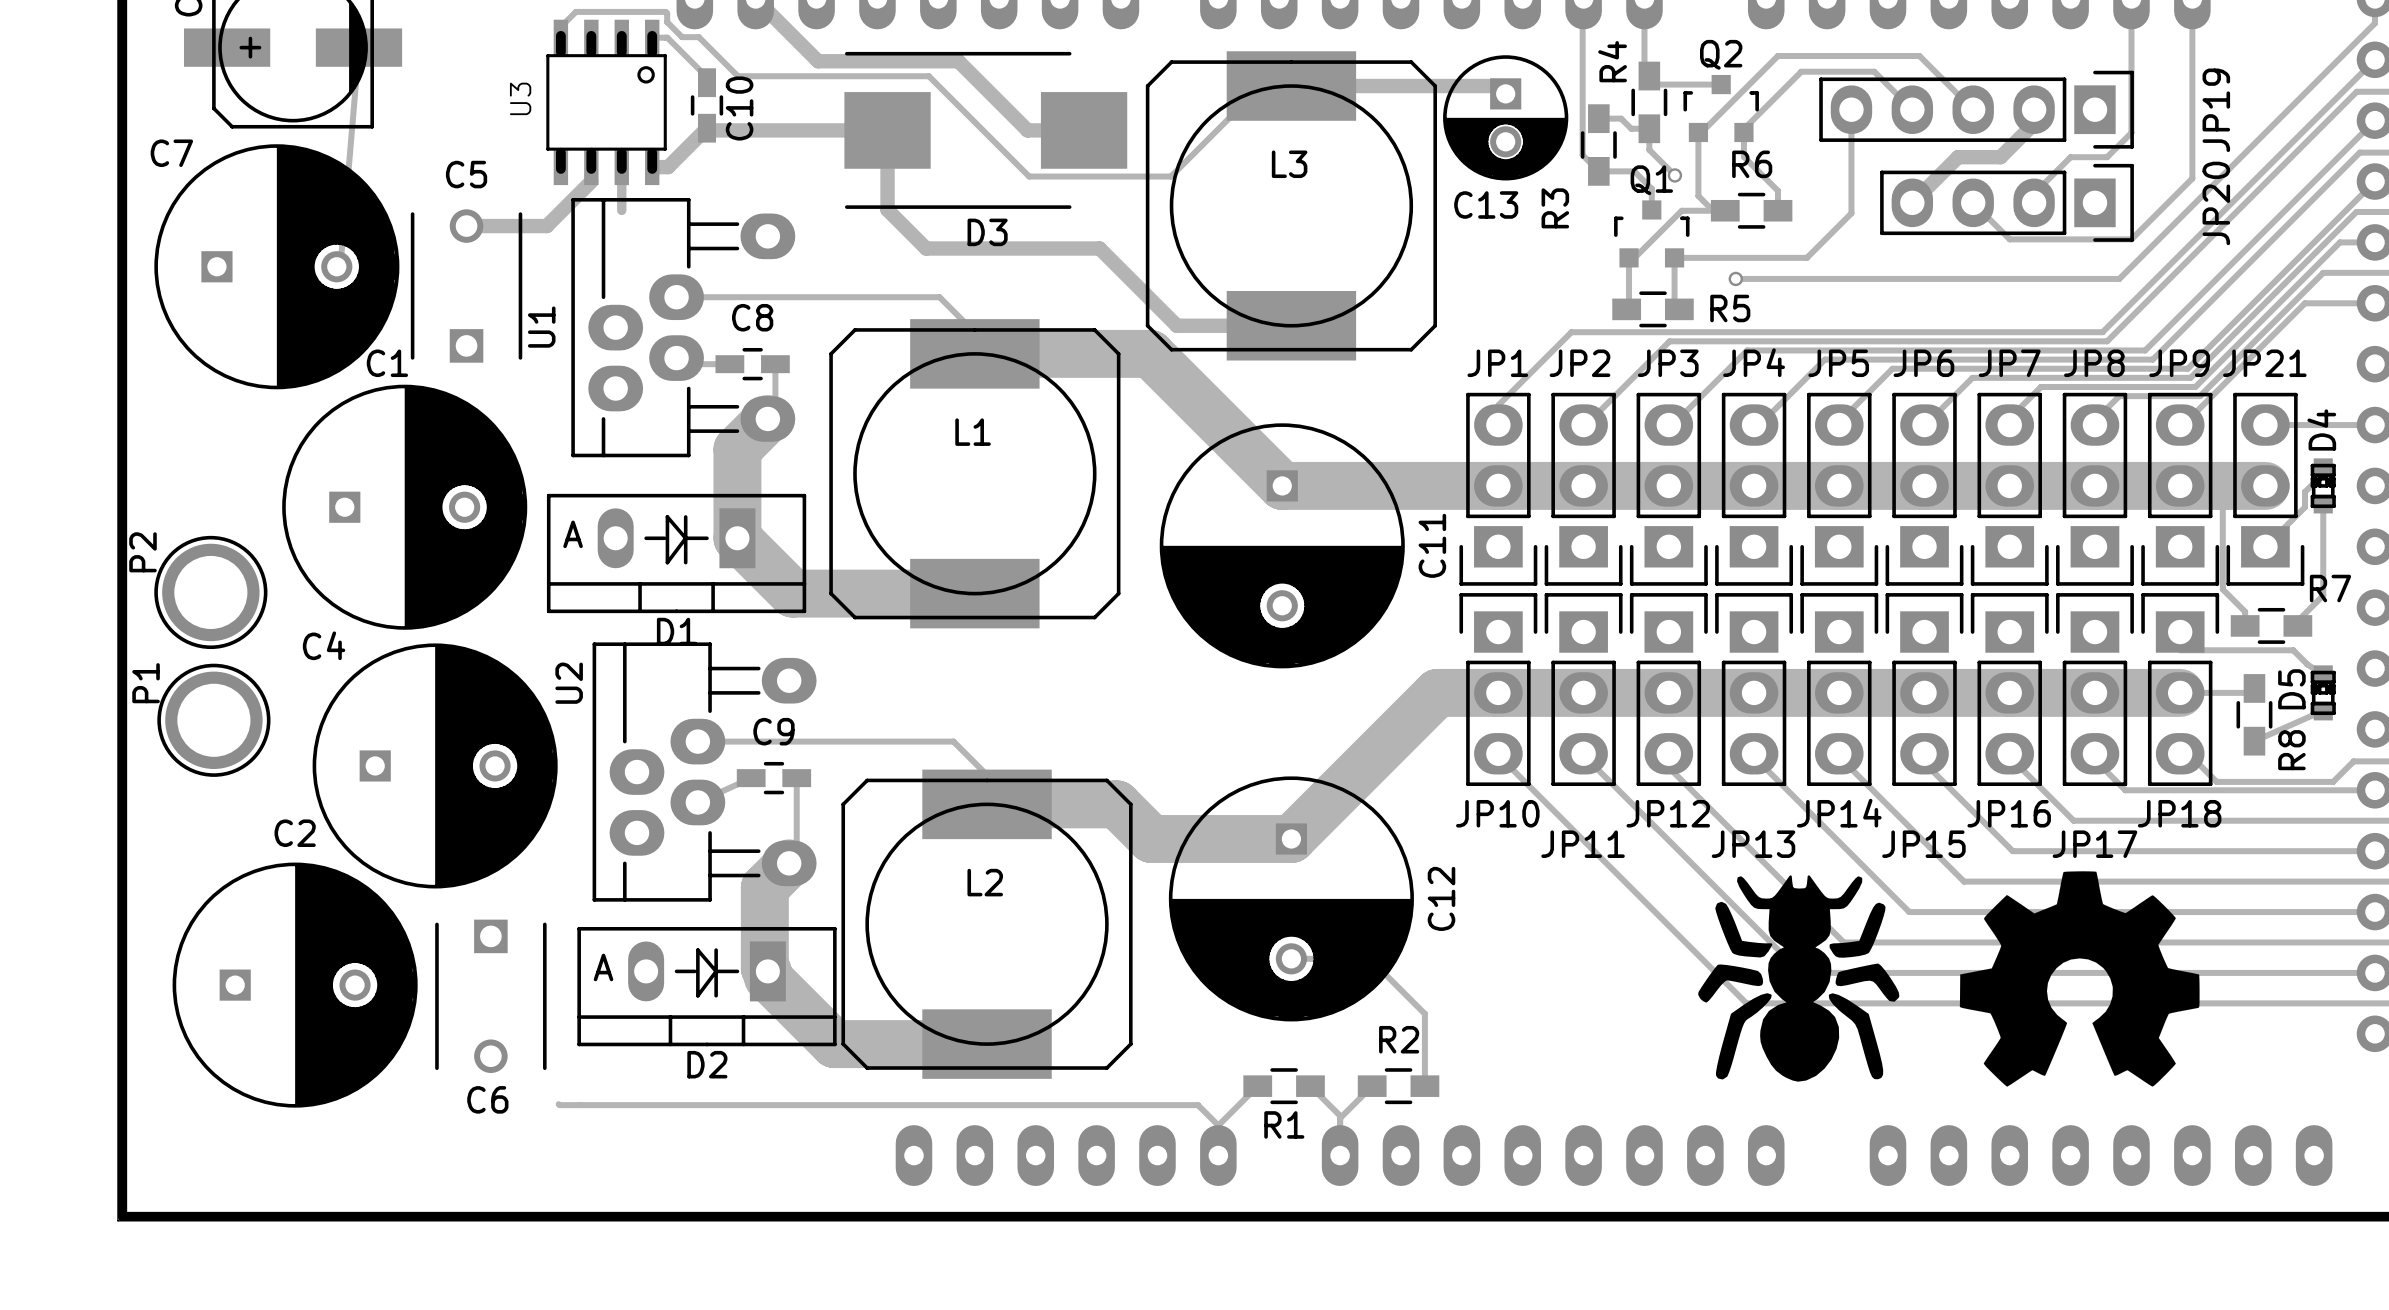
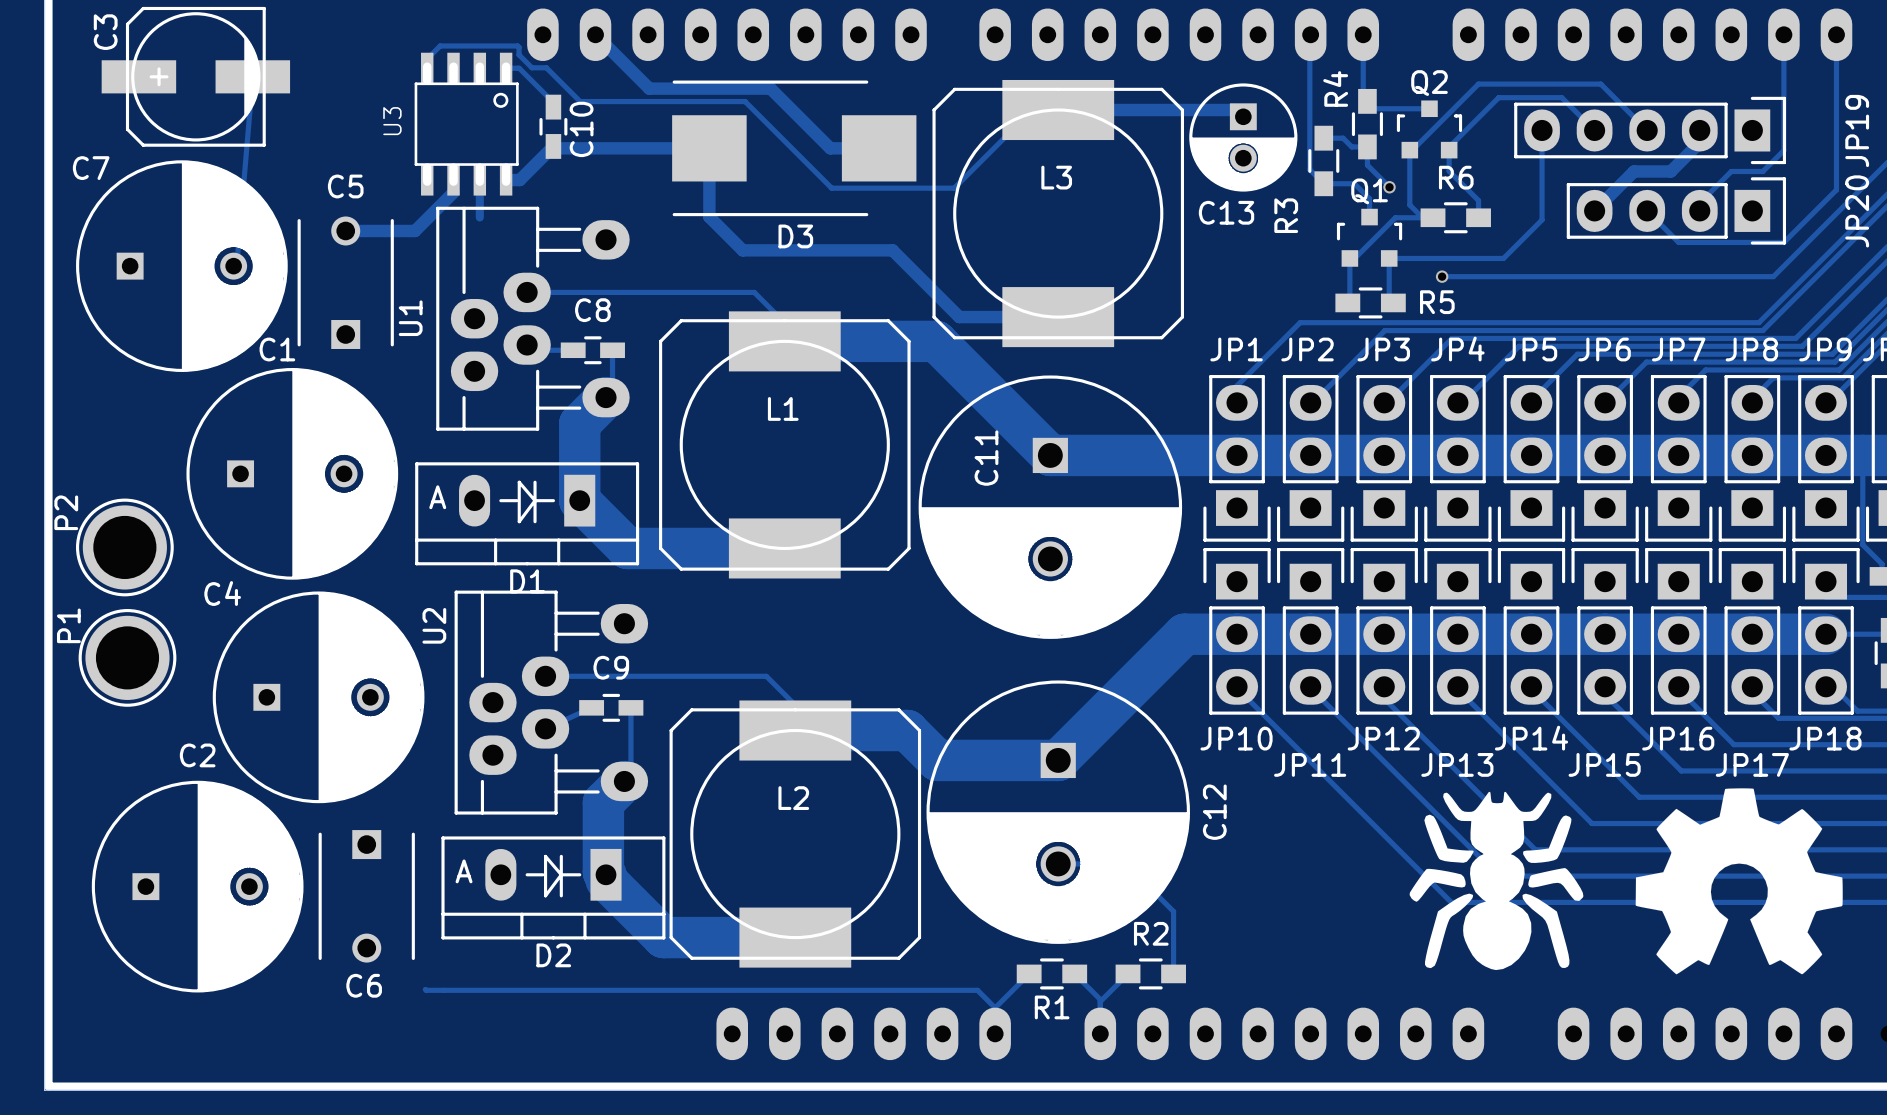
C11 footprint: [1159, 423, 1405, 669] -> [918, 375, 1183, 639]
C11 name position: C11 (1432, 545) -> C11 (986, 458)
C12 footprint: [1168, 776, 1414, 1022] -> [926, 680, 1190, 944]

